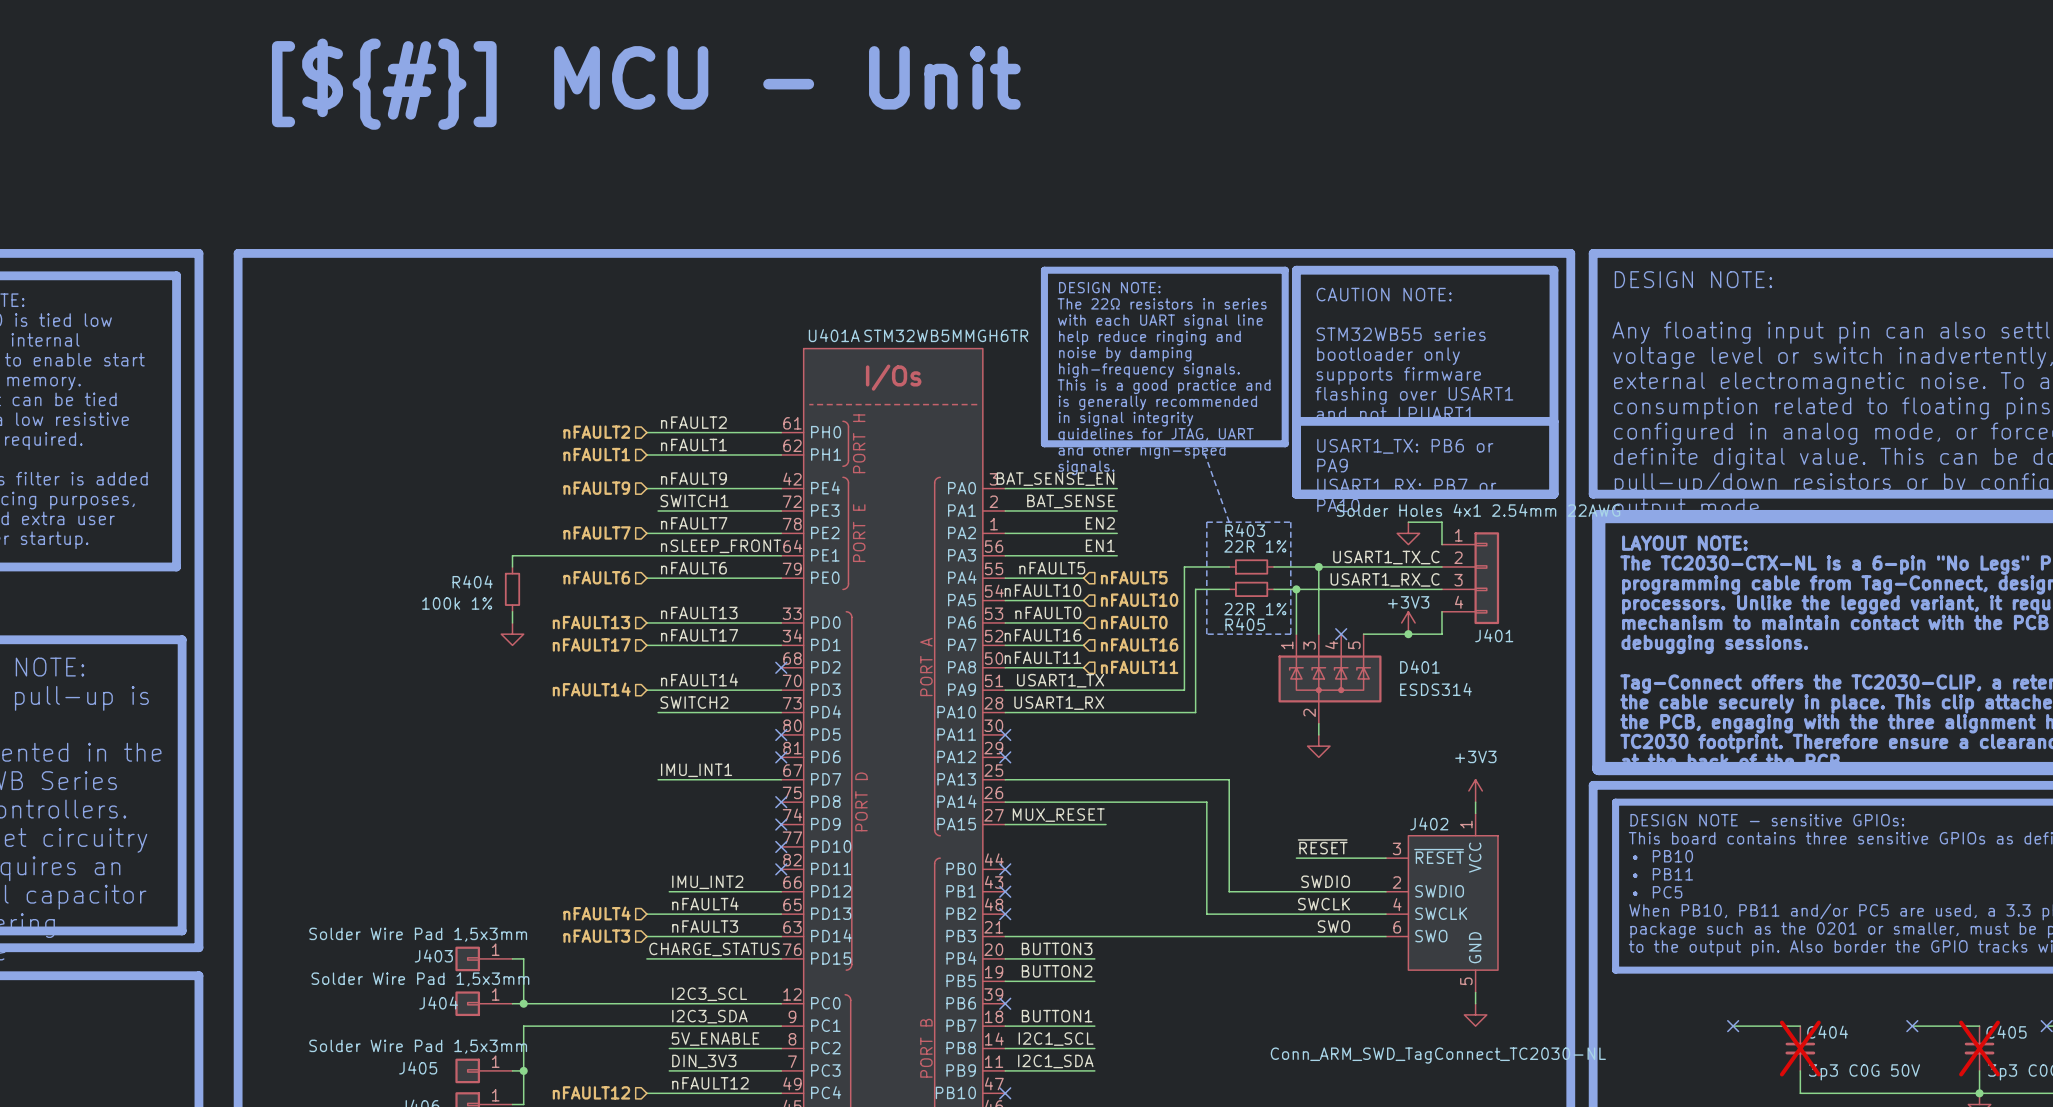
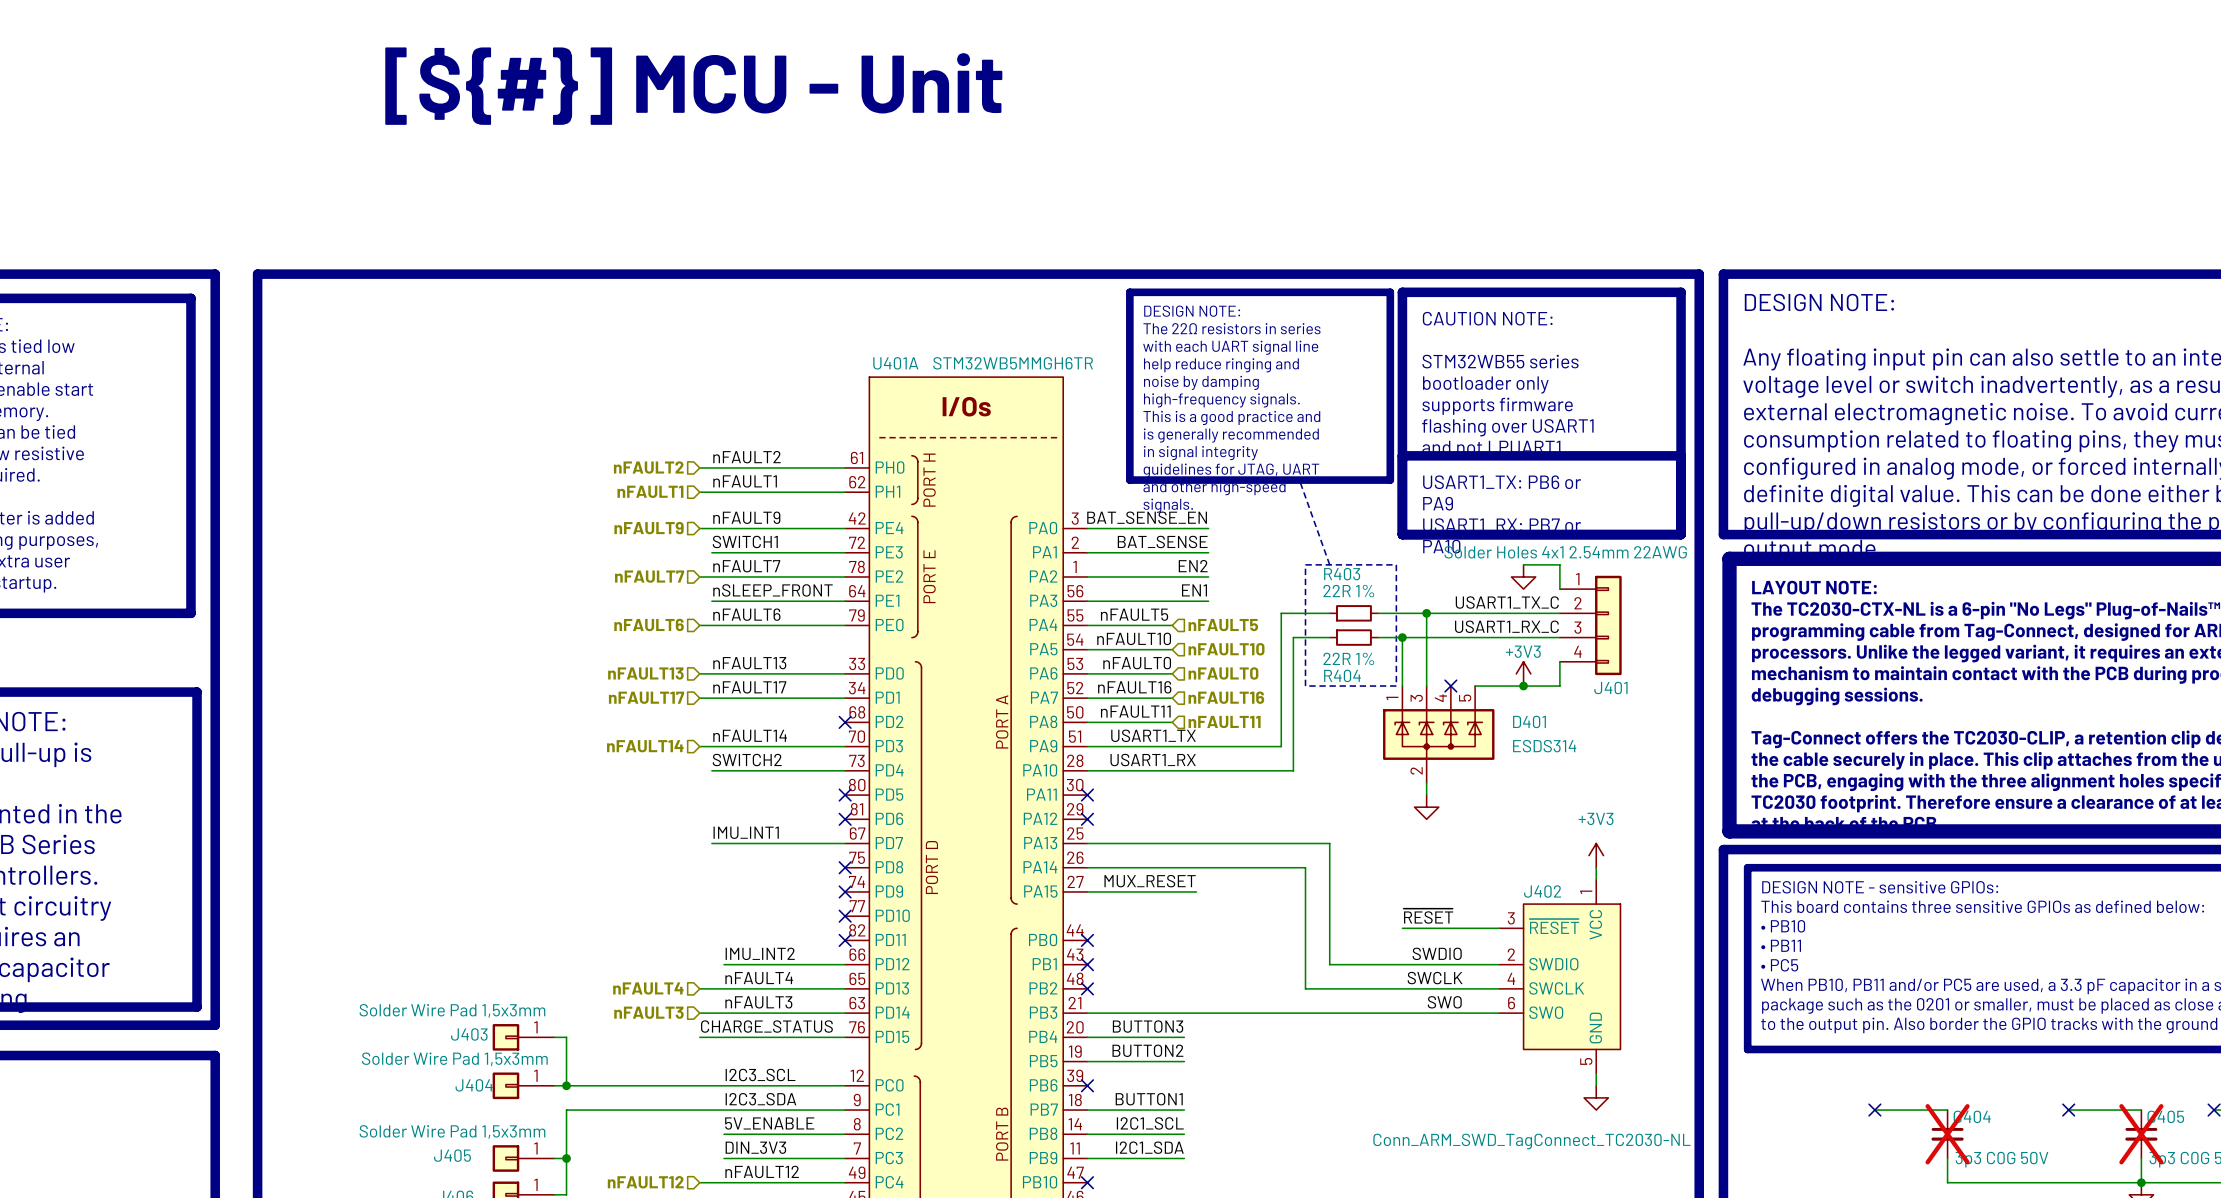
wire: (658, 555) (512, 555) (512, 566) -> none
R404: 100k 1% (512, 589) -> none
wire: (512, 611) (512, 622) -> none
R405 name: R405 (1245, 624) -> R404 (1342, 675)
power symbol: (512, 634) -> none

